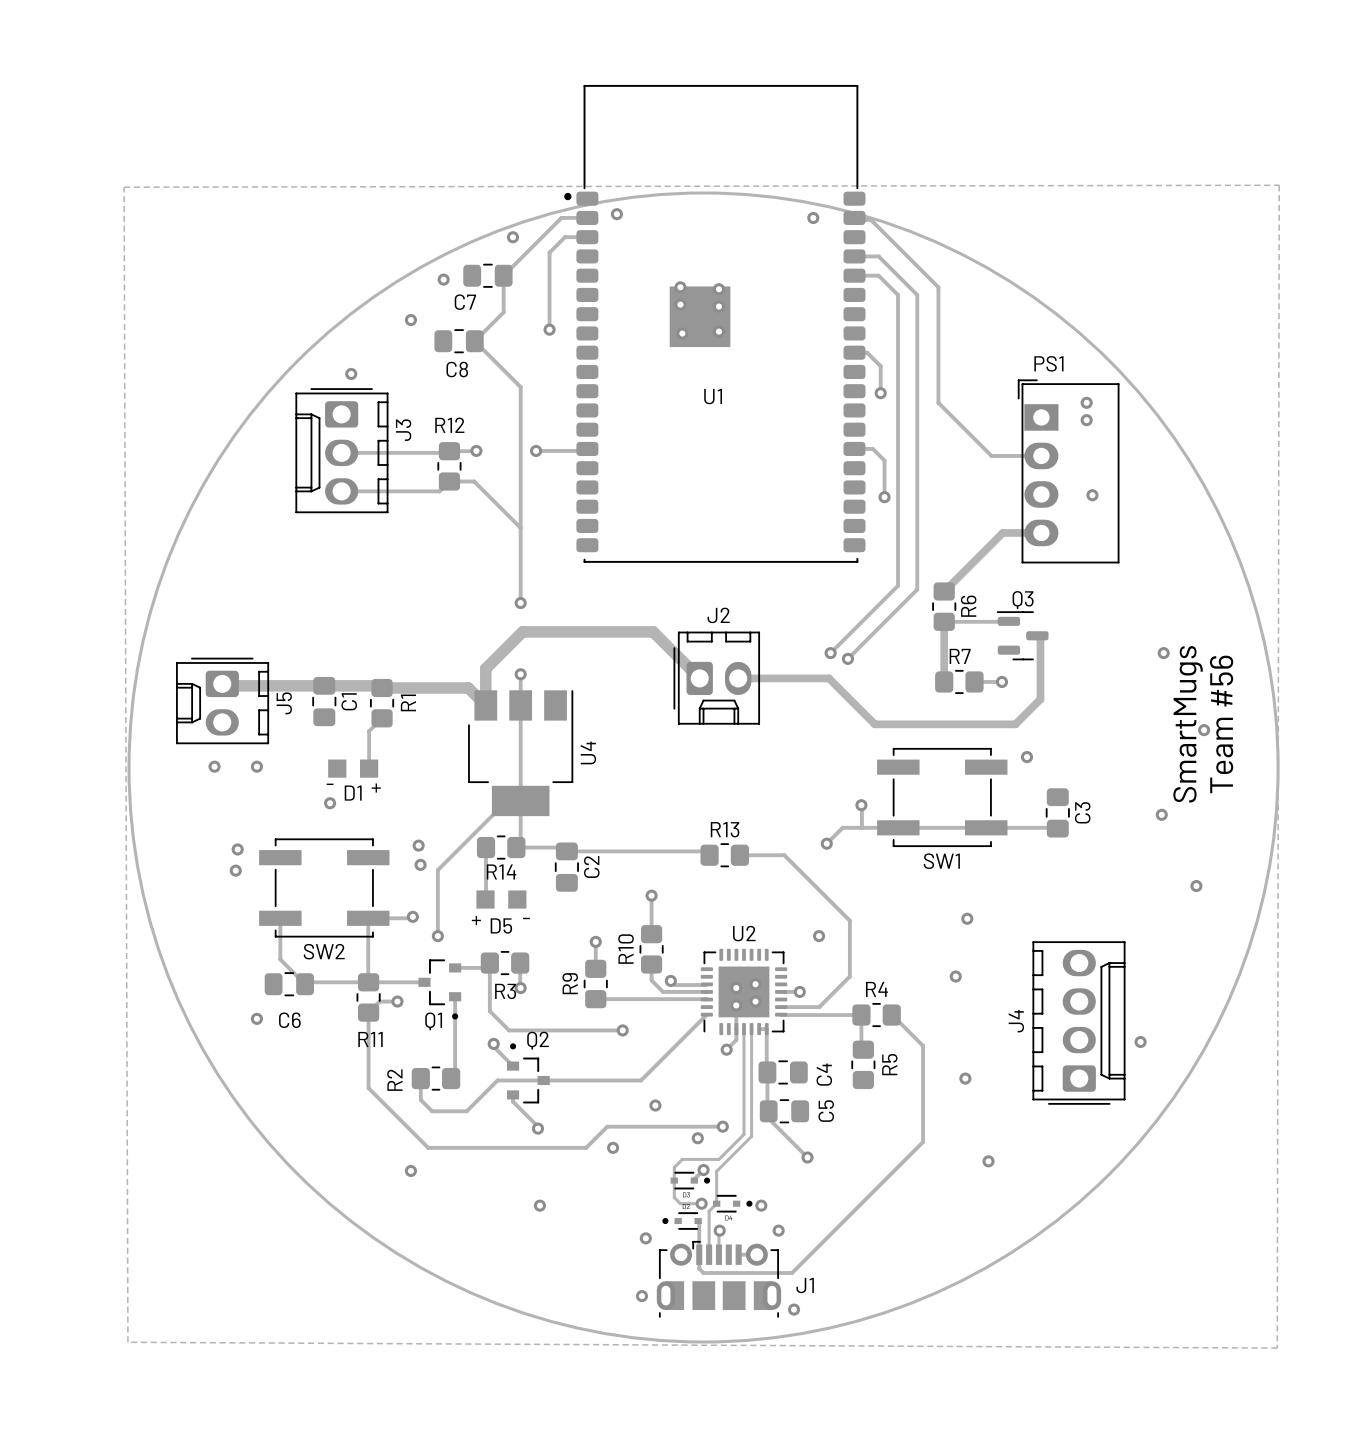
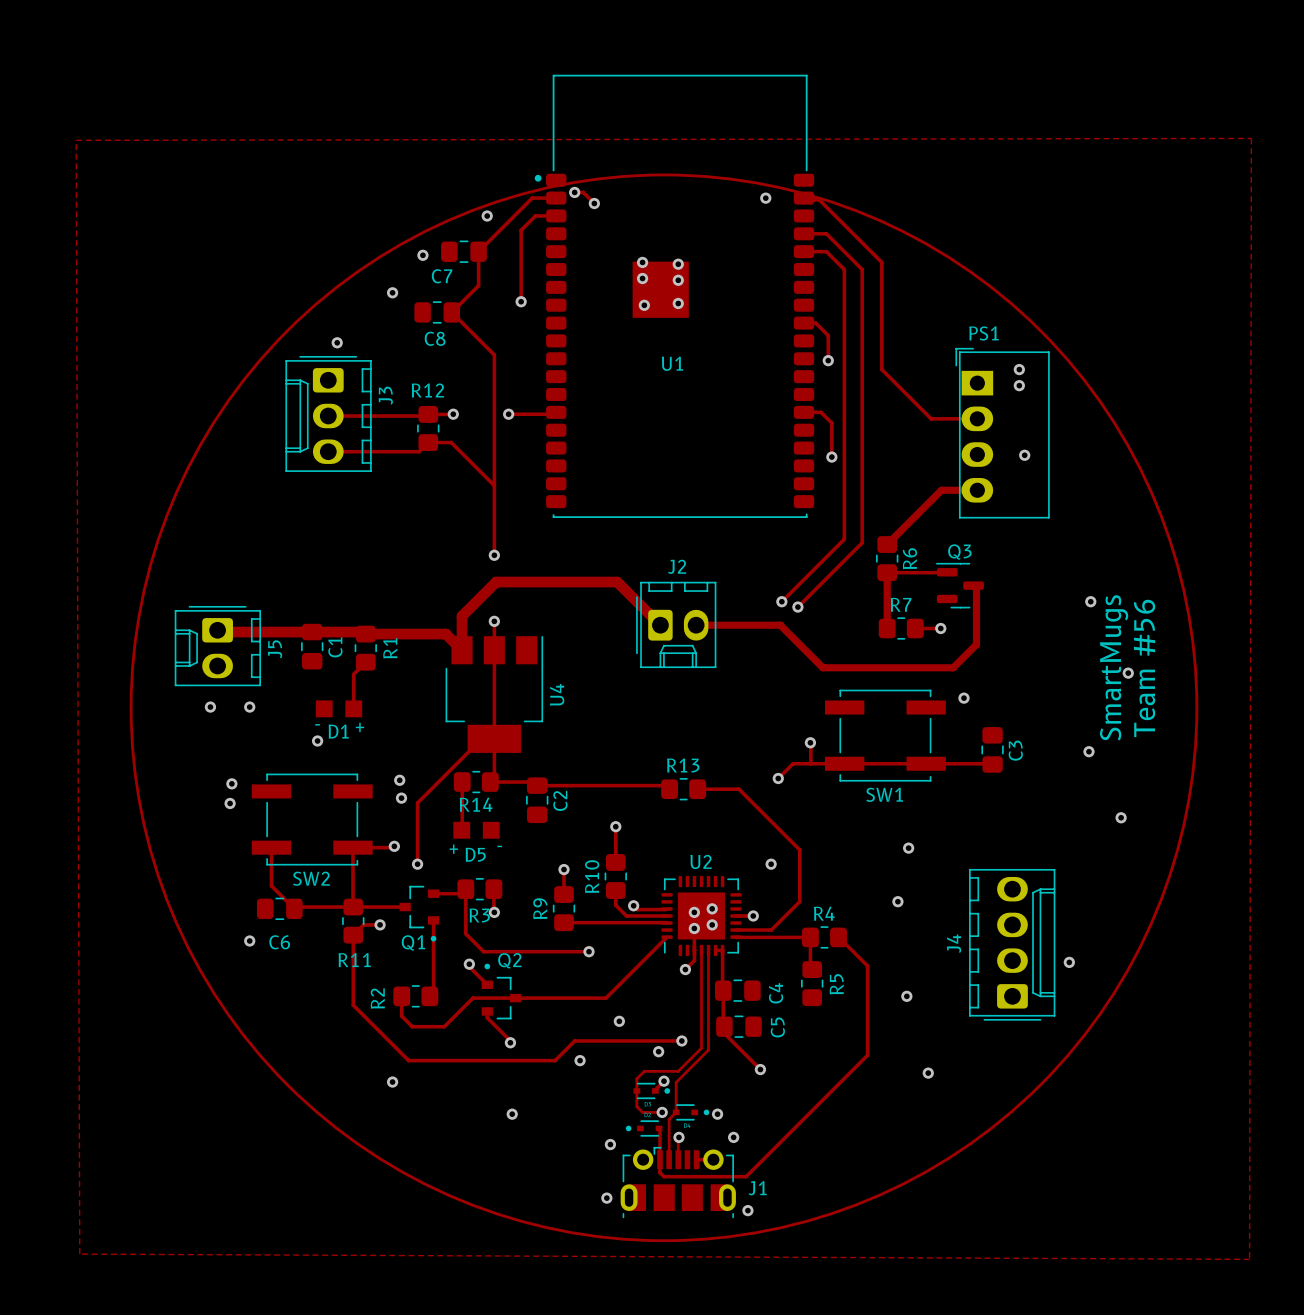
zone outline: (1279, 185) (124, 187) (127, 1342) (1277, 1348) (1279, 185) -> (1251, 138) (76, 140) (79, 1254) (1249, 1259) (1251, 138)
track: none -> (574, 192) (583, 192) (594, 203)
via: none -> (574, 192)
via: (616, 214) -> none
via: none -> (594, 203)

